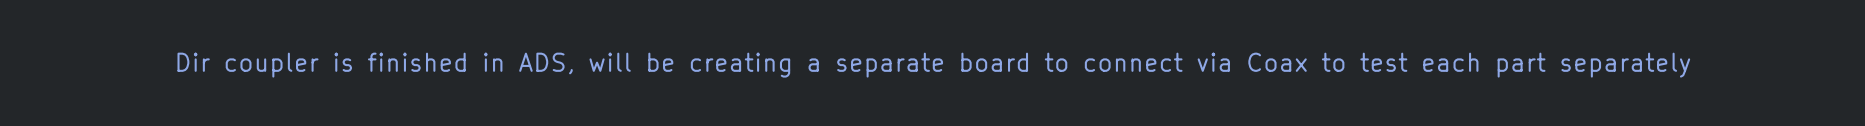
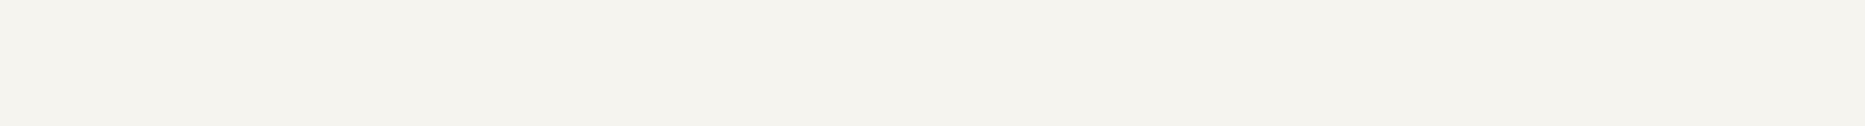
text: Dir coupler is finished in ADS, will be creating a separate board to connect via Coax to test each part separately (933, 65) -> none

